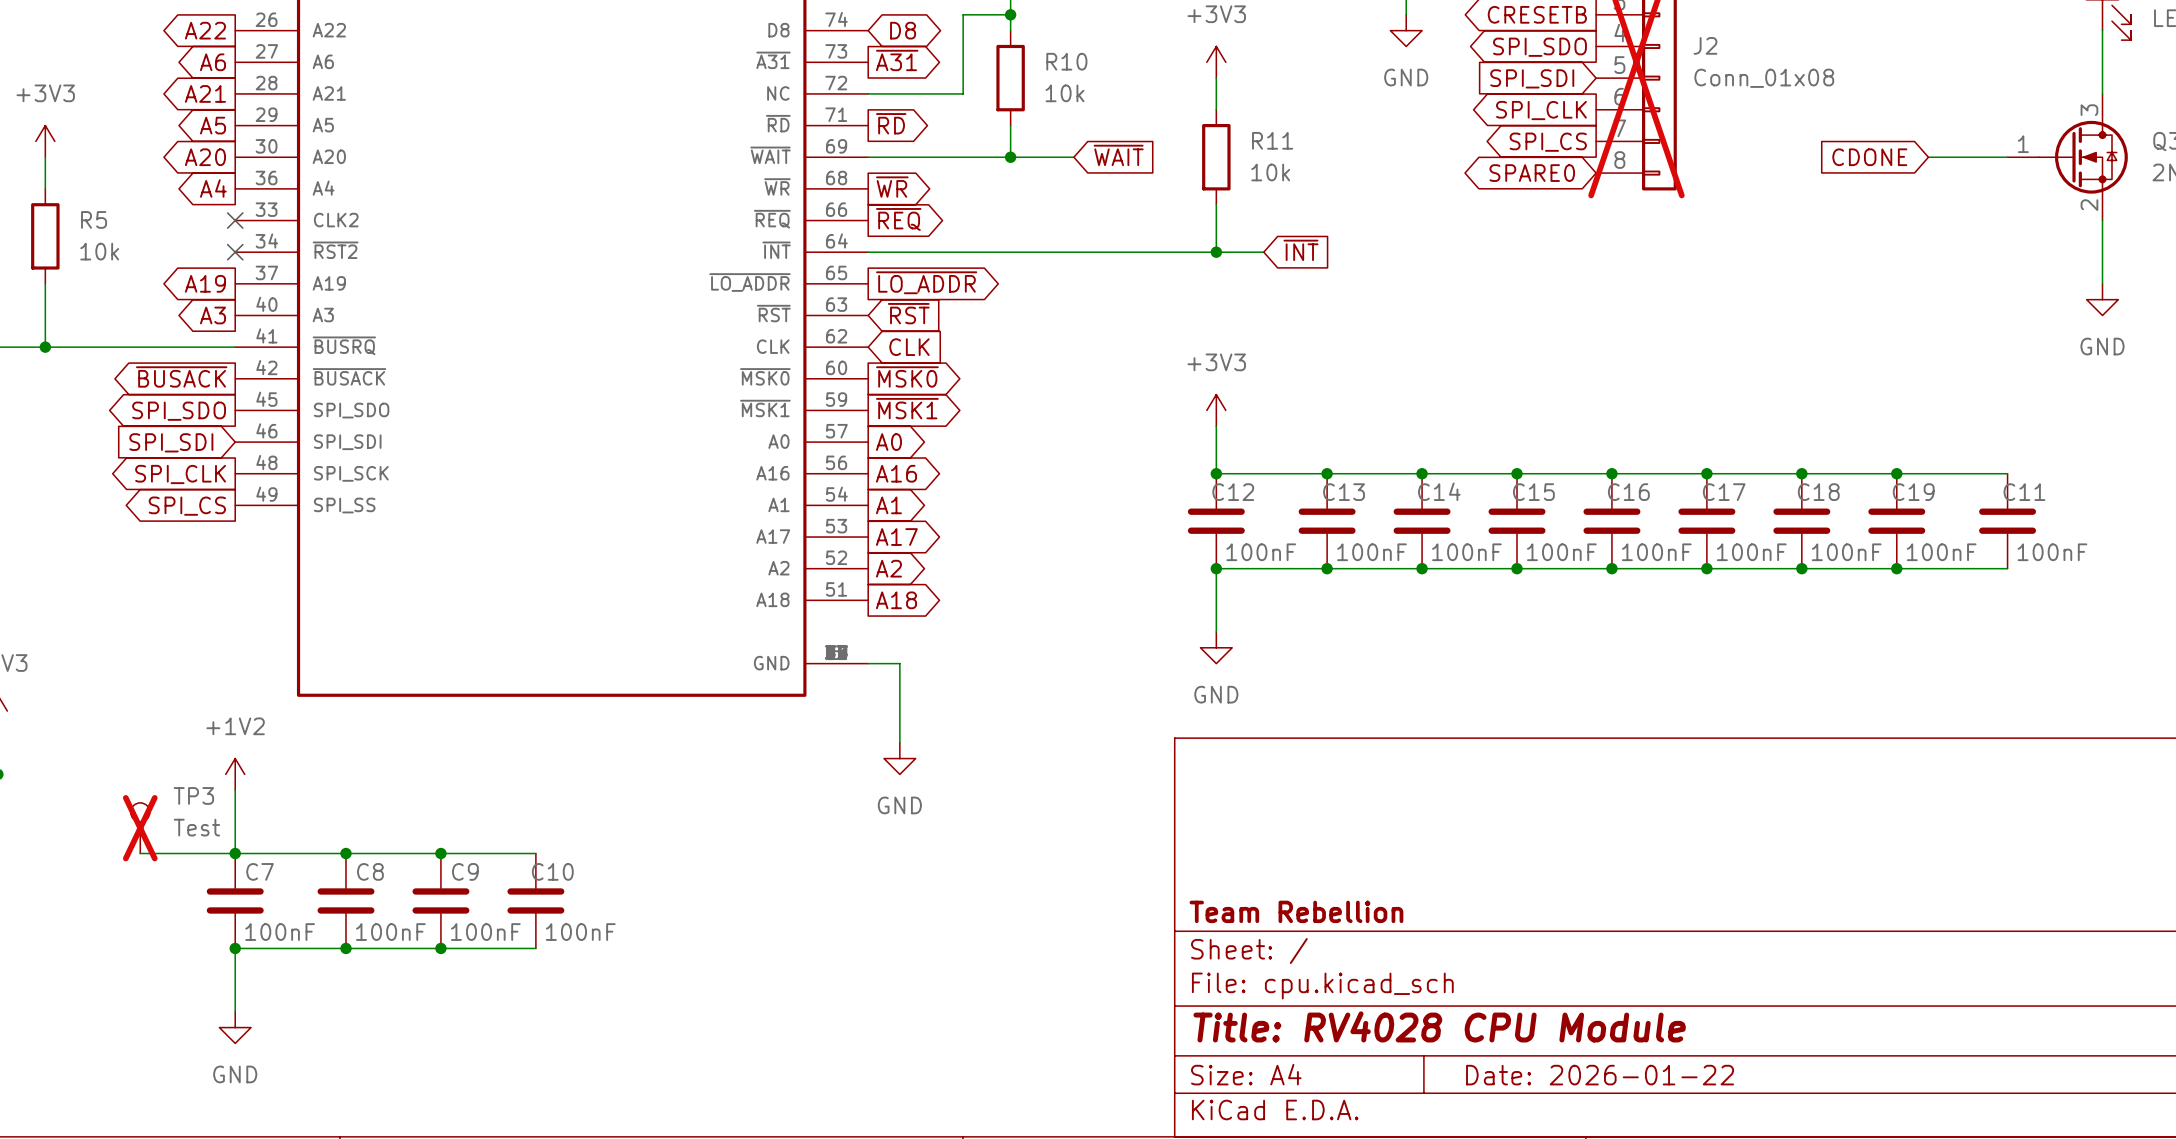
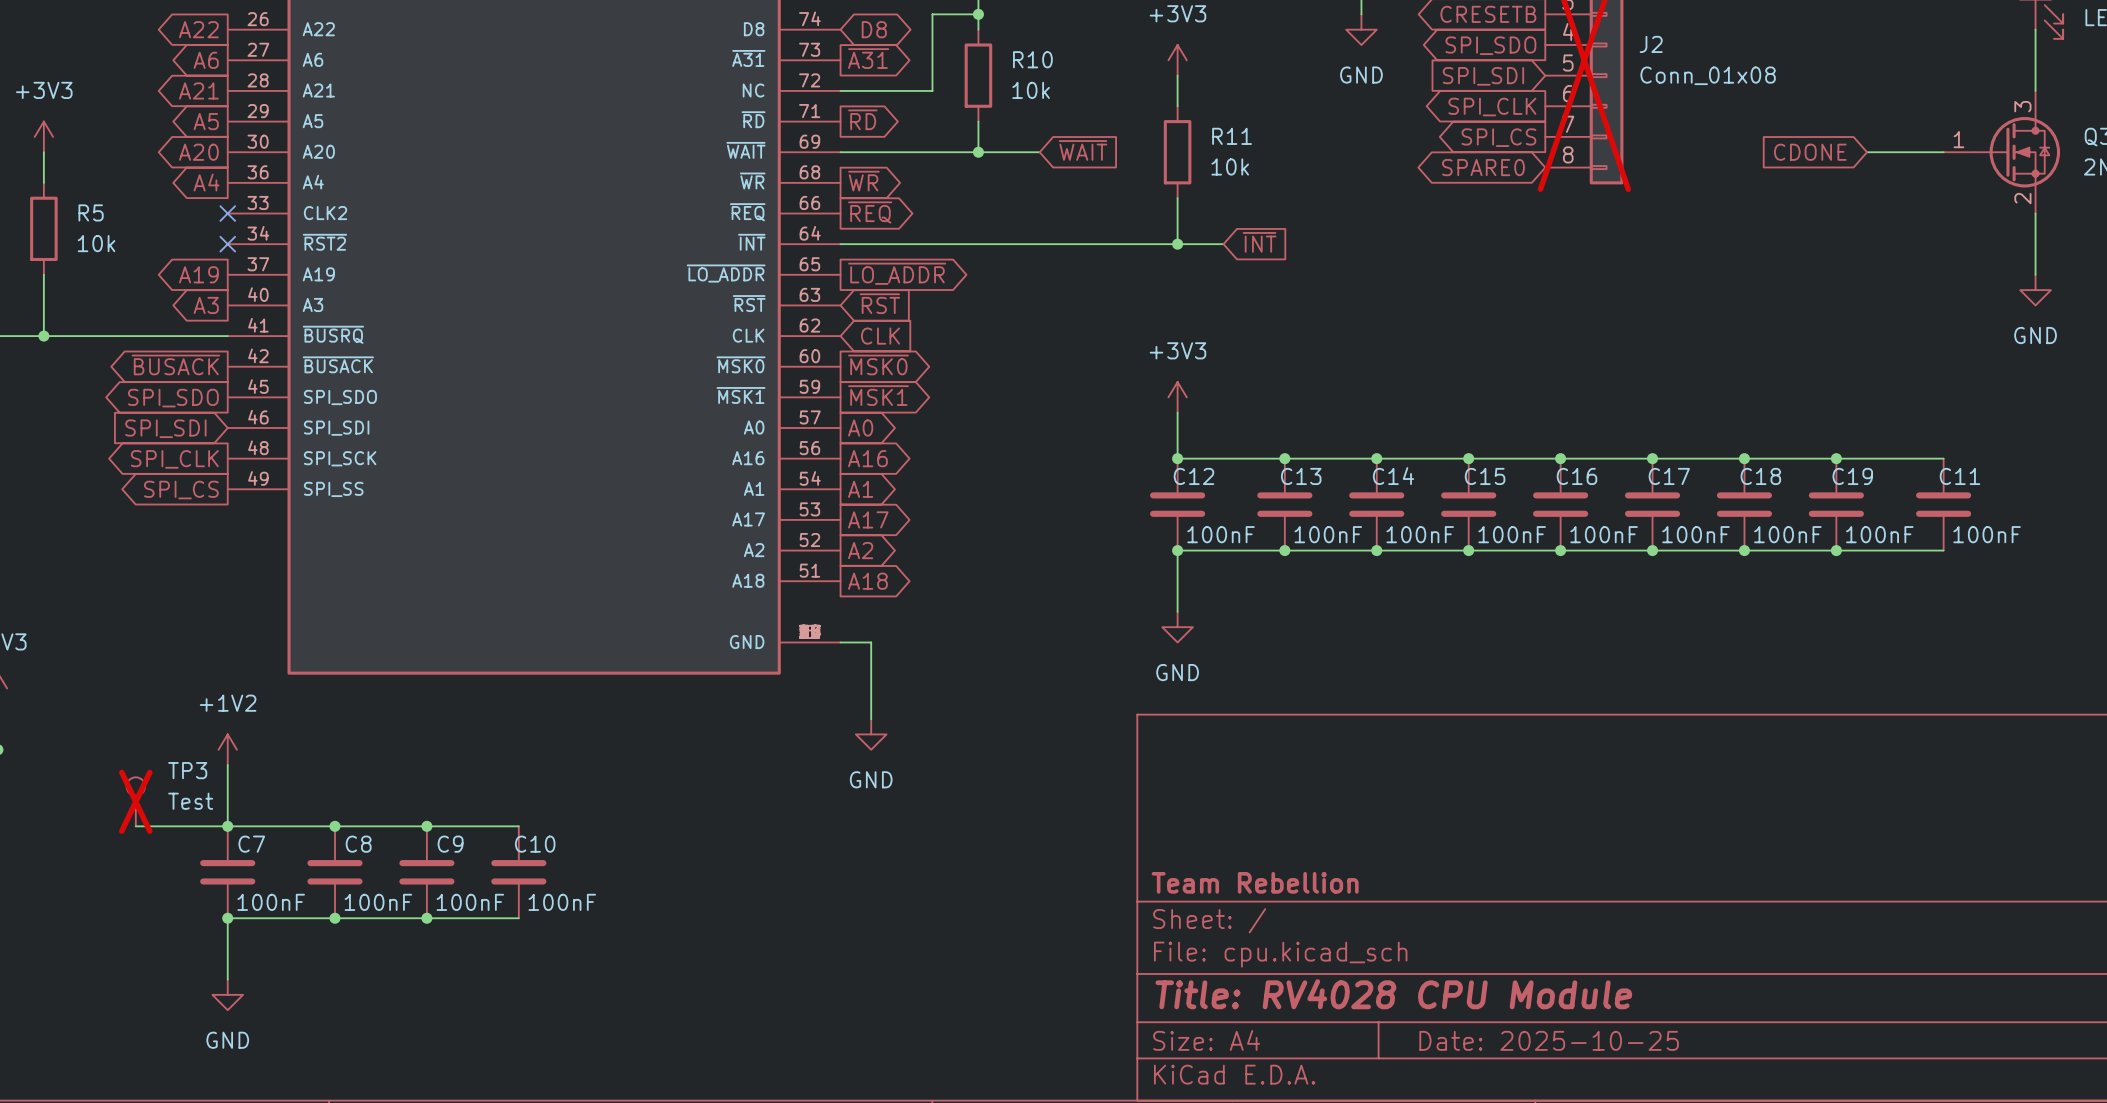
title block: Date: 2026-01-22 (1600, 1075) -> Date: 2025-10-25 (1549, 1040)

